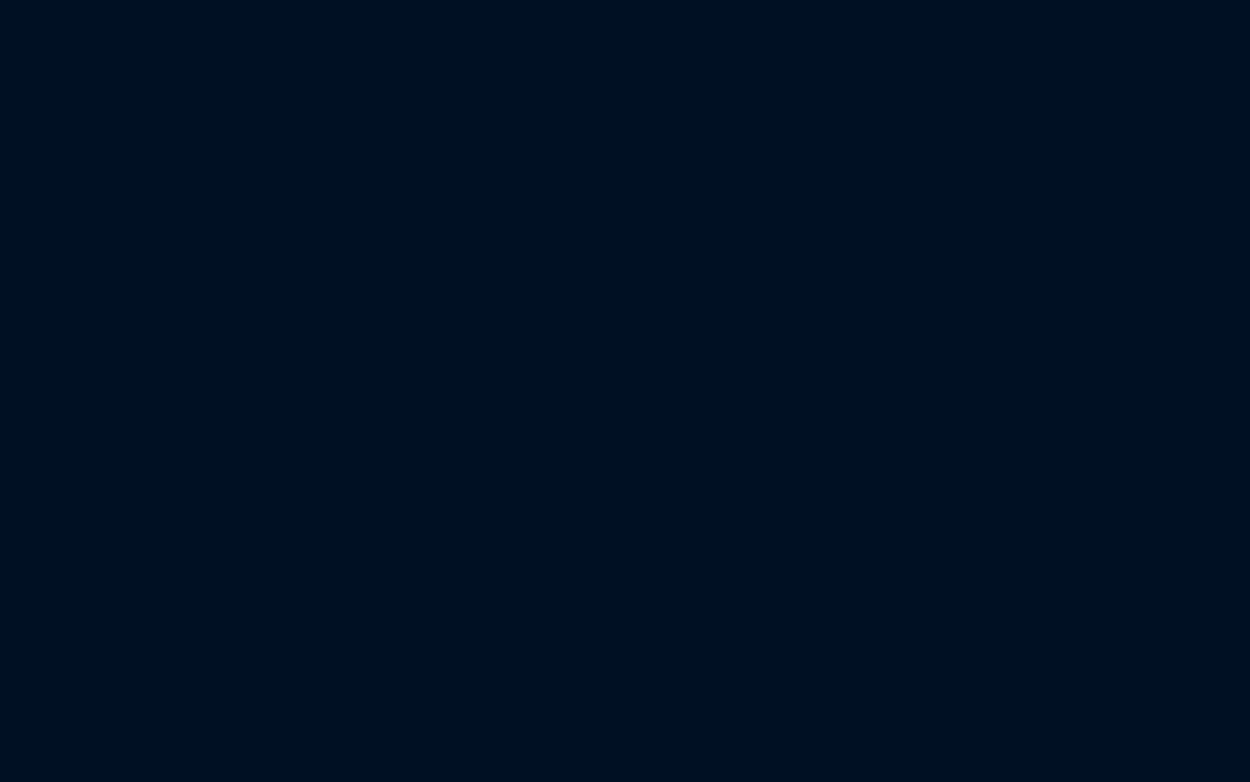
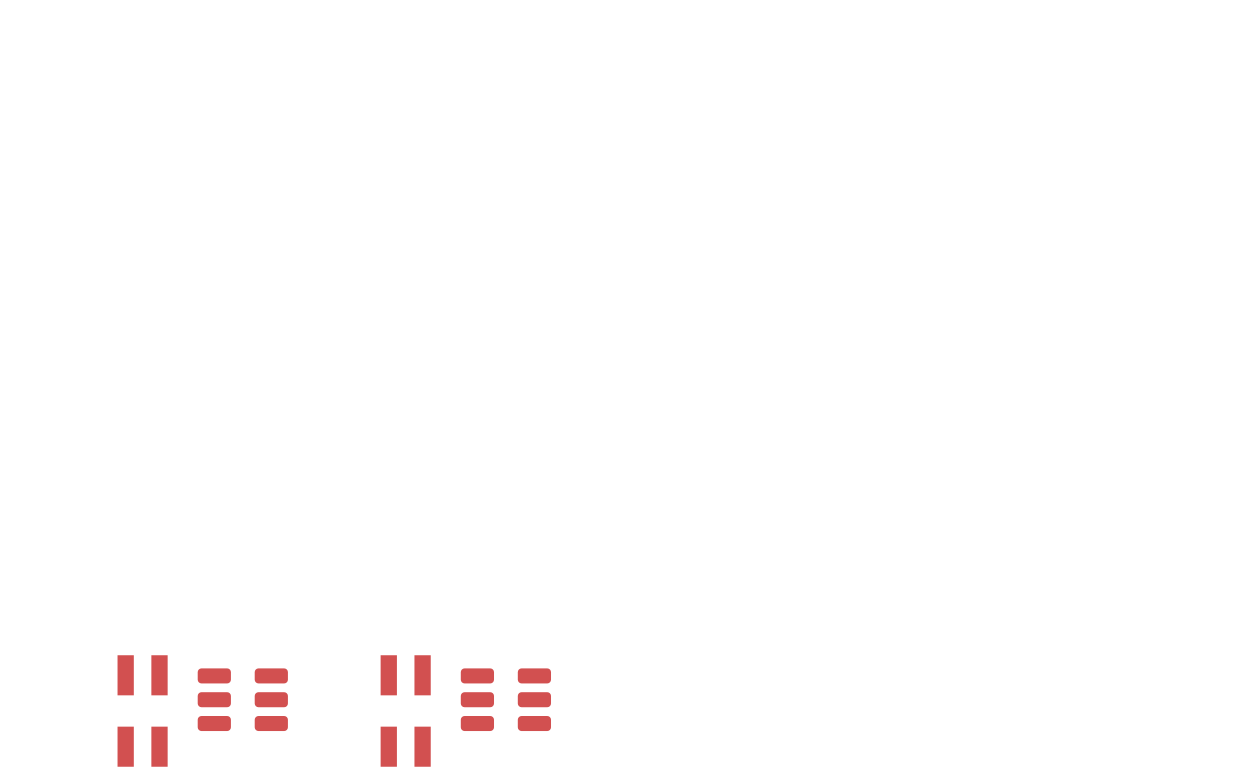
part: none -> (142, 675)
part: none -> (405, 675)
part: none -> (242, 699)
part: none -> (505, 699)
part: none -> (142, 746)
part: none -> (405, 746)

